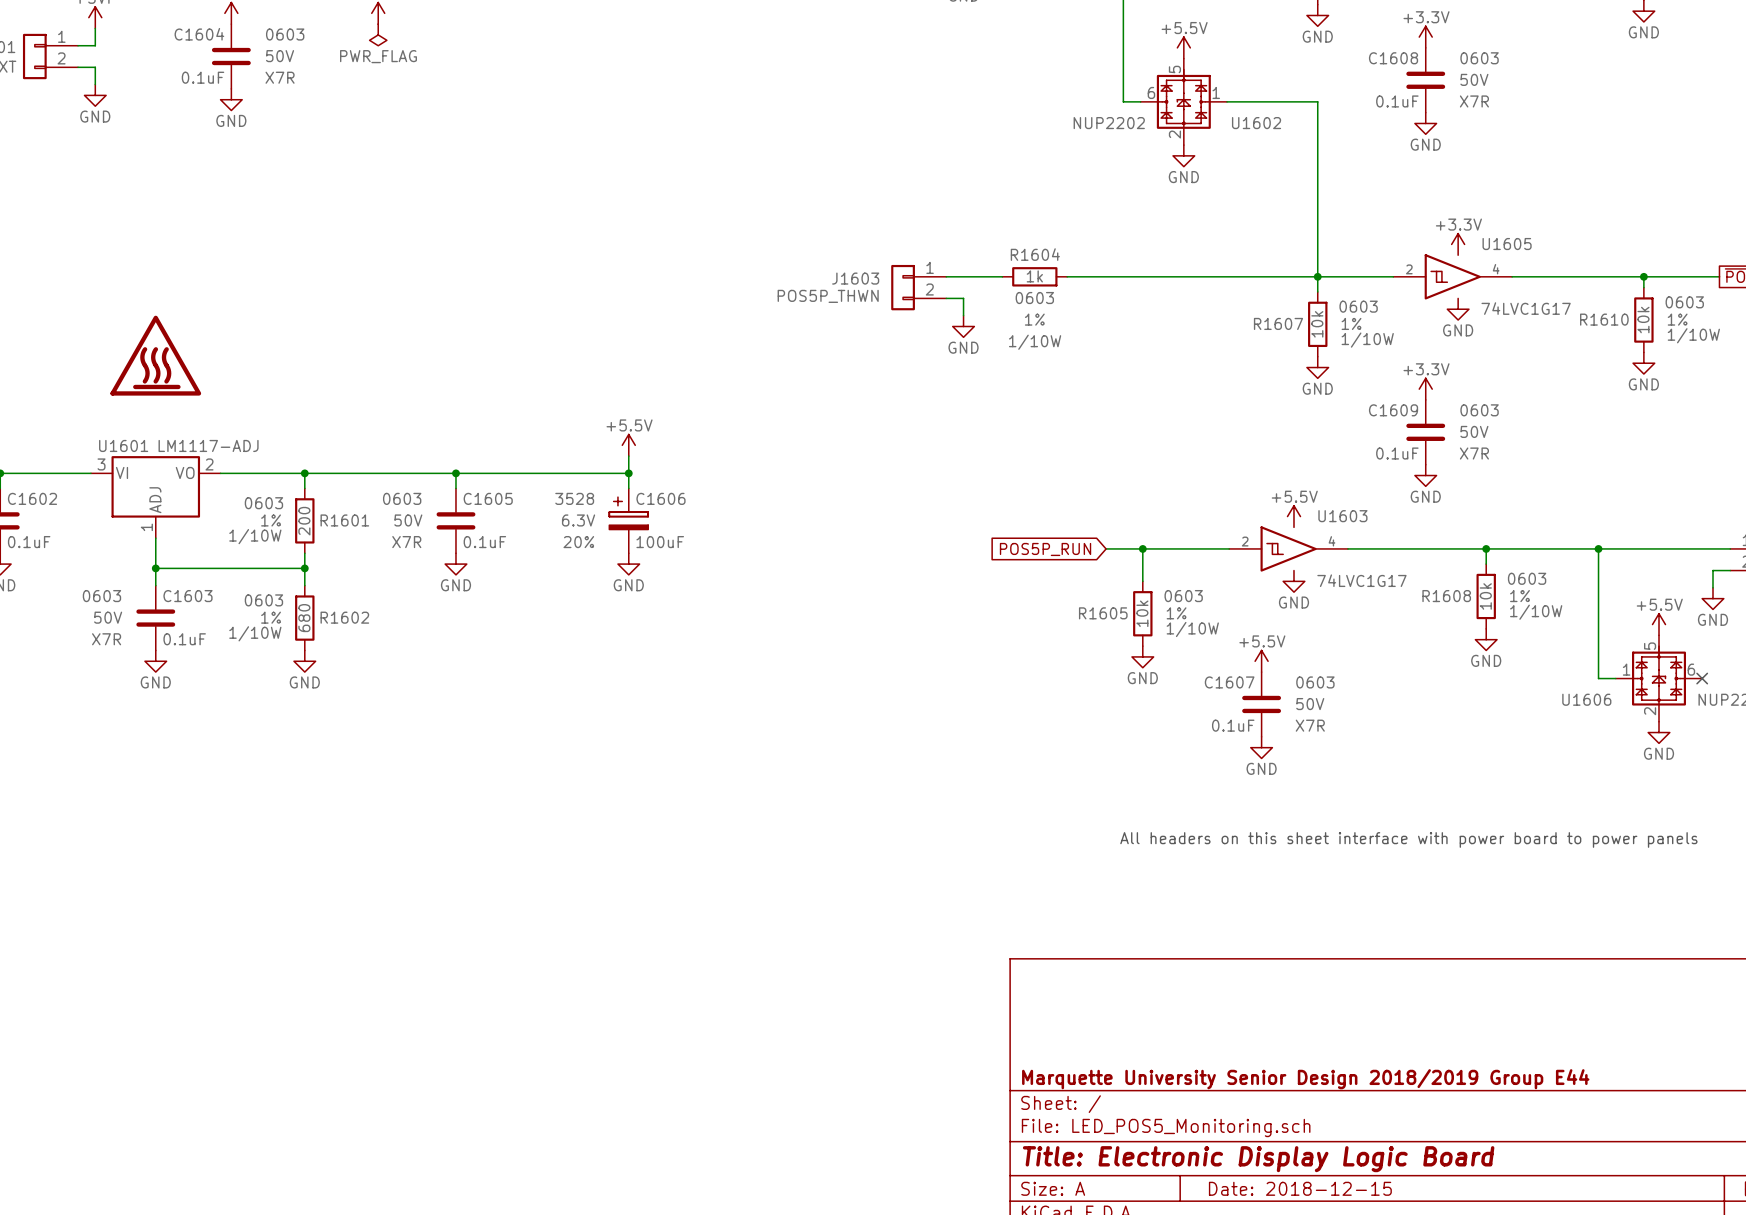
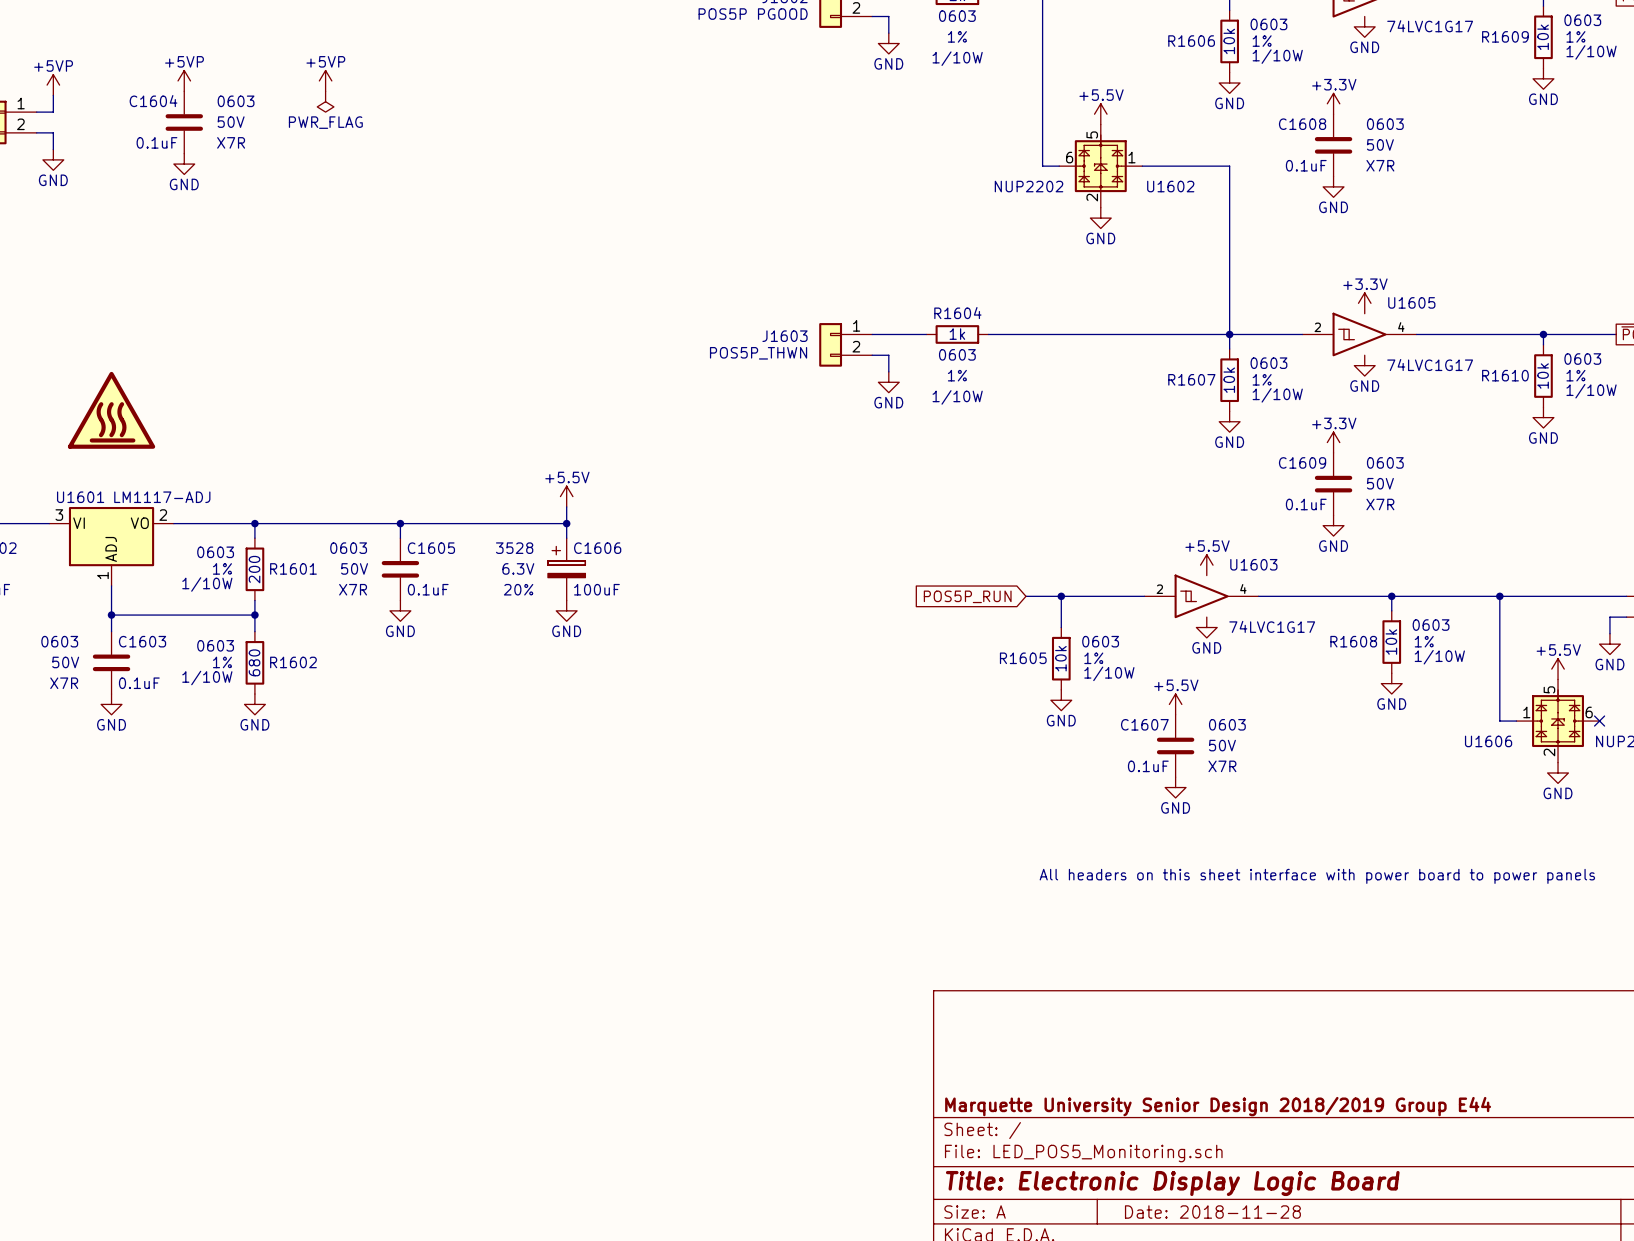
title block: Date: 2018-12-15 (1300, 1188) -> Date: 2018-11-28 (1212, 1212)

